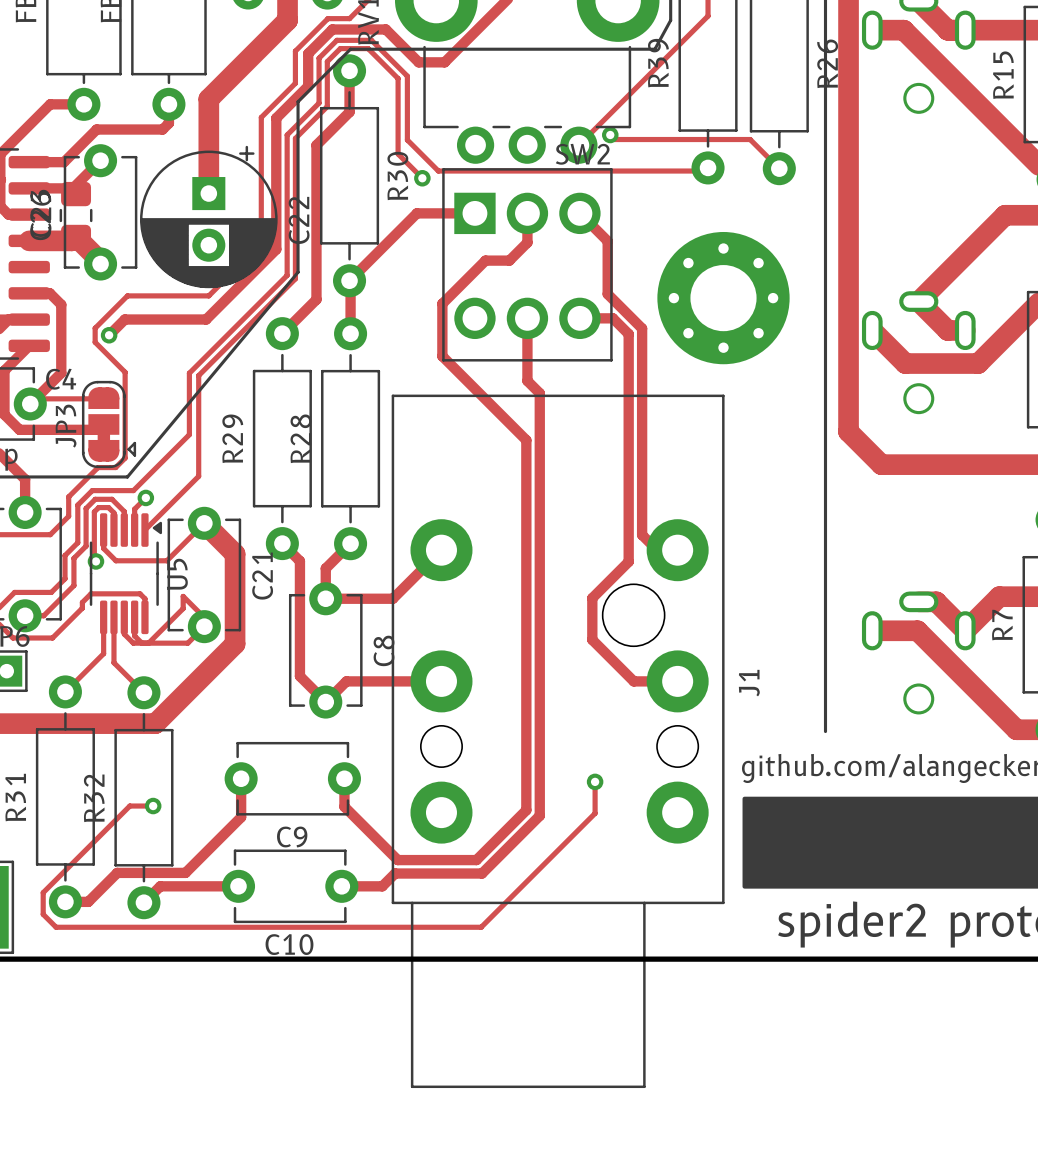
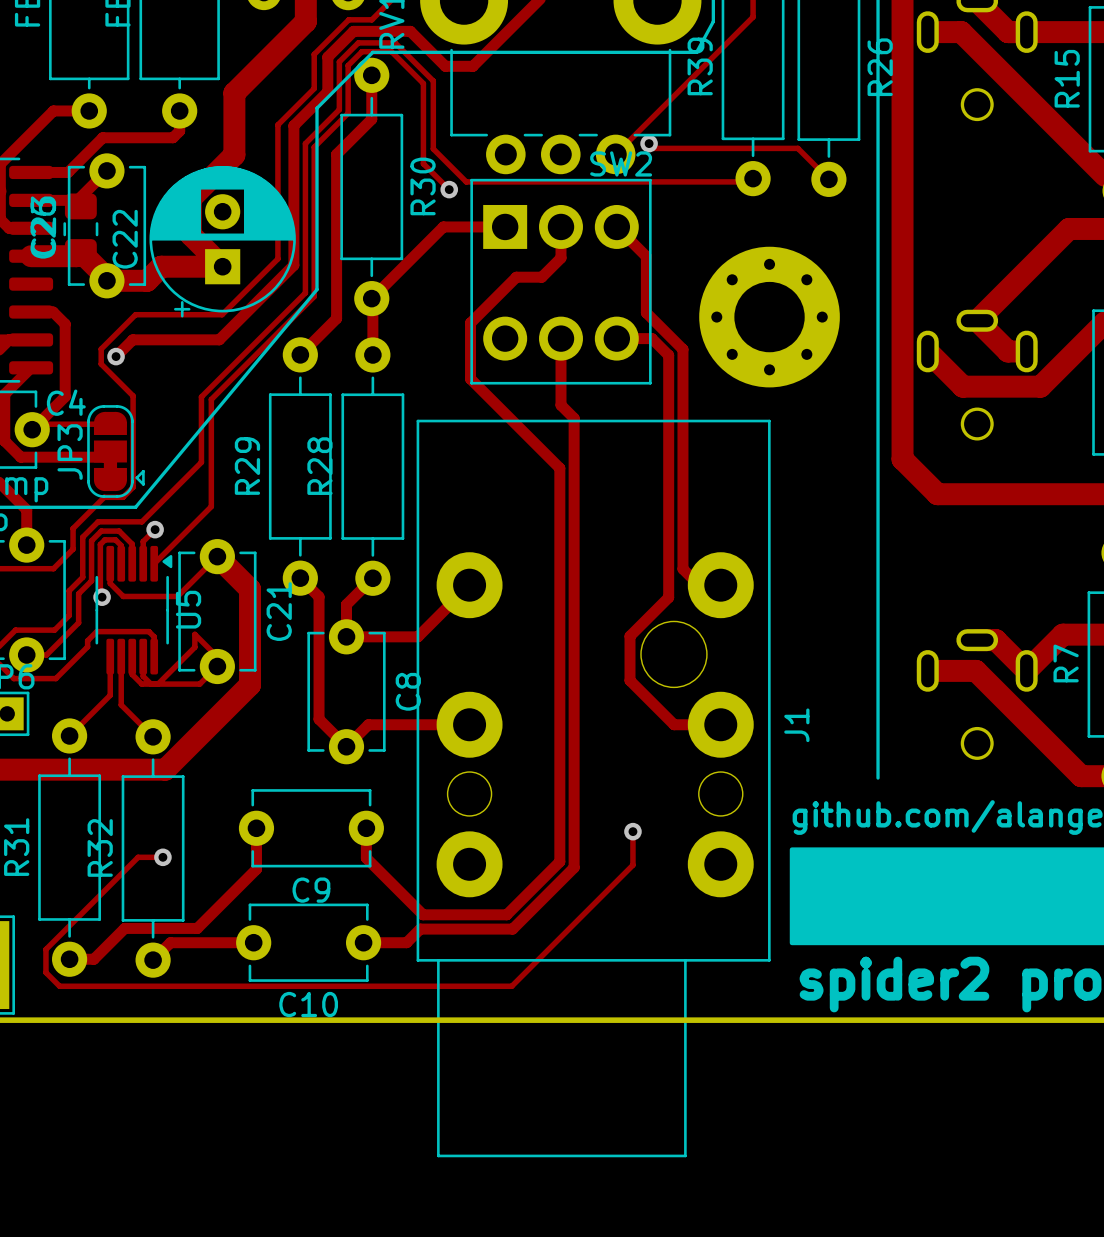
track: (220, 87) (208, 99) (208, 193) -> (234, 93) (234, 154) (190, 198) (190, 234) (222, 266) (161, 266) (147, 280) (106, 280)
C22 rotation: 0° (208, 217) -> 180° (222, 241)

